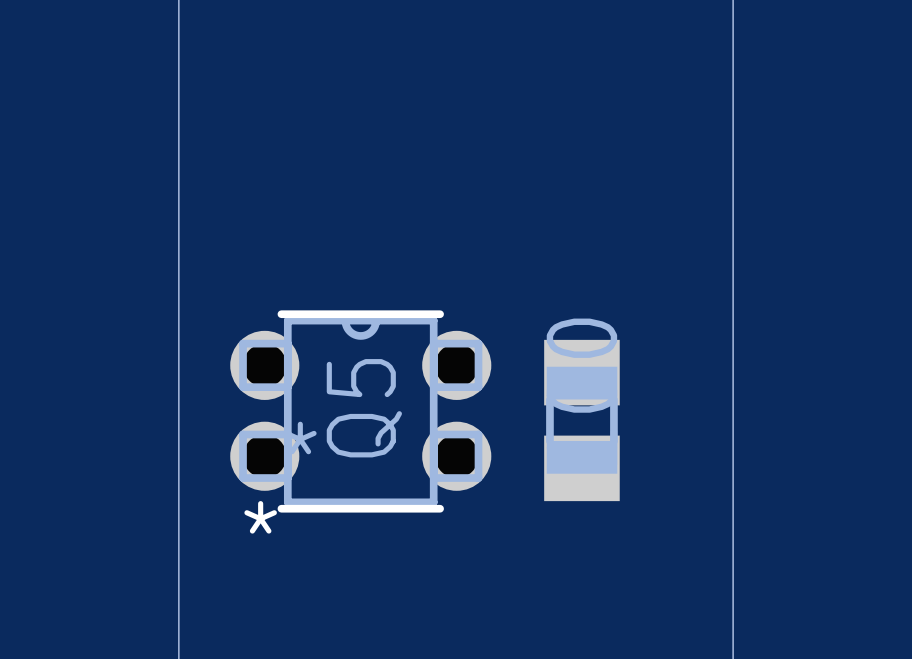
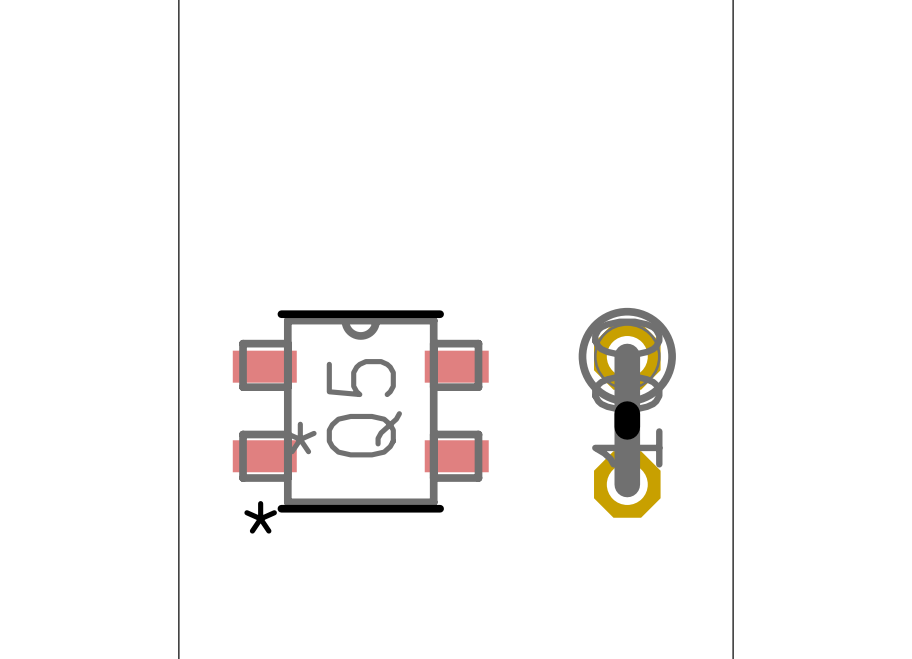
Q5 footprint: [230, 310, 492, 513] -> [232, 310, 489, 513]
part footprint: [544, 339, 620, 502] -> [578, 307, 676, 518]

